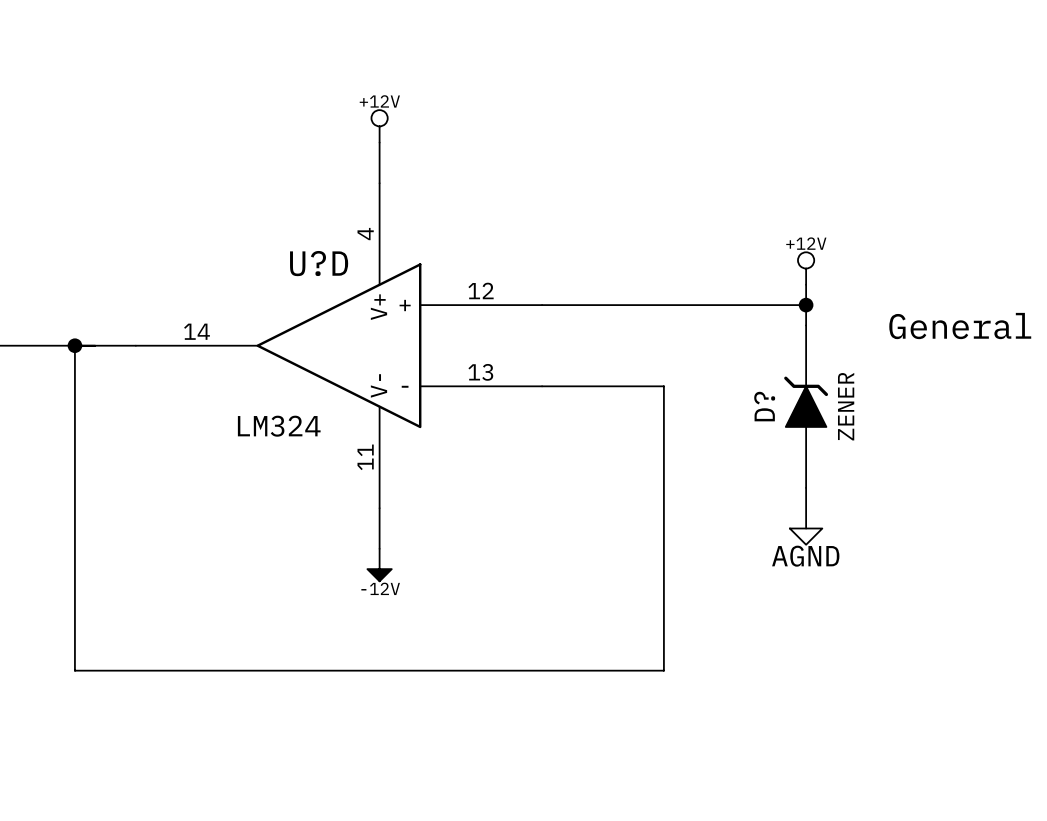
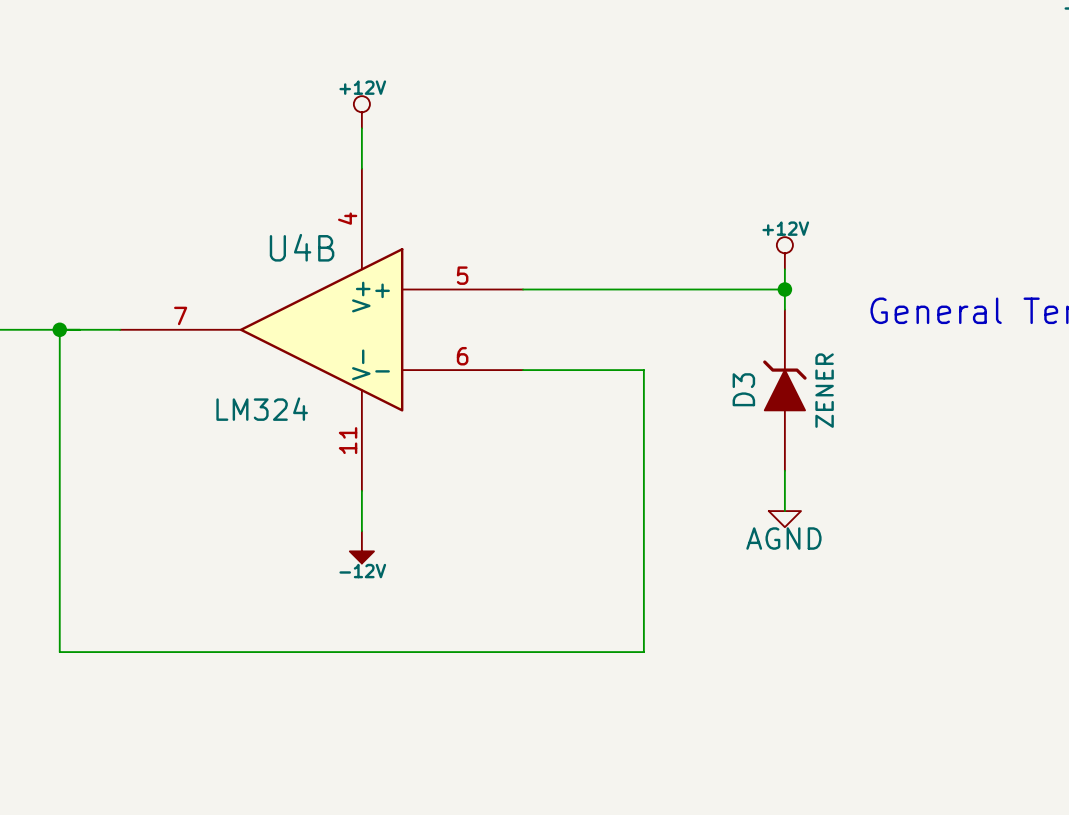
U?D name: U?D (319, 263) -> U4B (302, 247)
U?D pin number: 12 (481, 290) -> 5 (462, 275)
U?D pin number: 14 (196, 331) -> 7 (180, 315)
U?D pin number: 13 (480, 372) -> 6 (462, 356)
D? name: D? (764, 406) -> D3 (743, 389)

